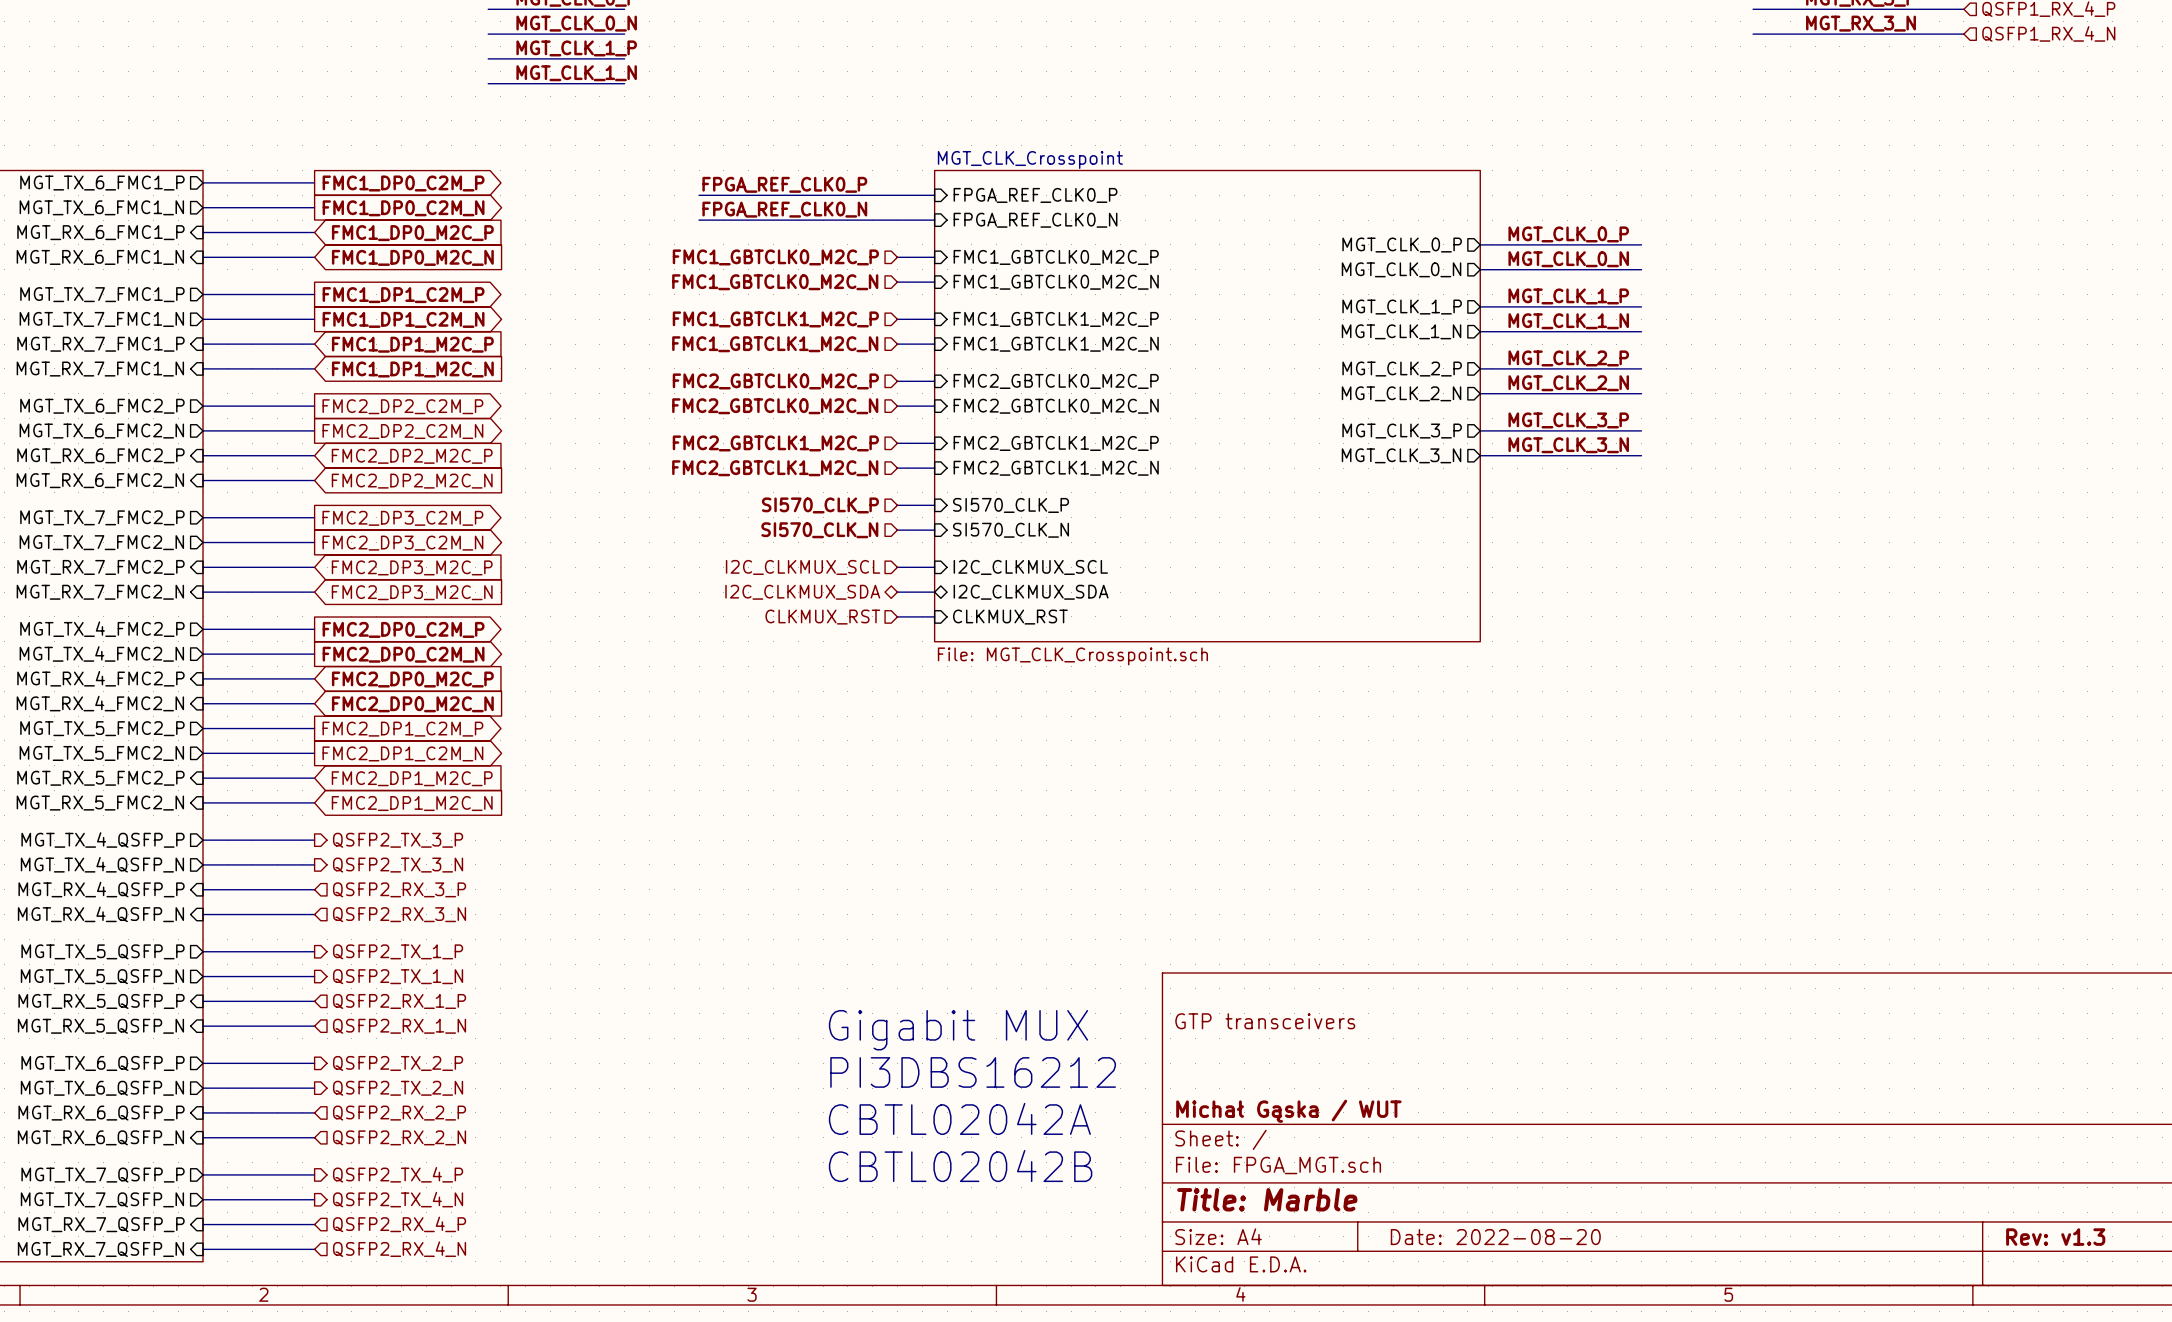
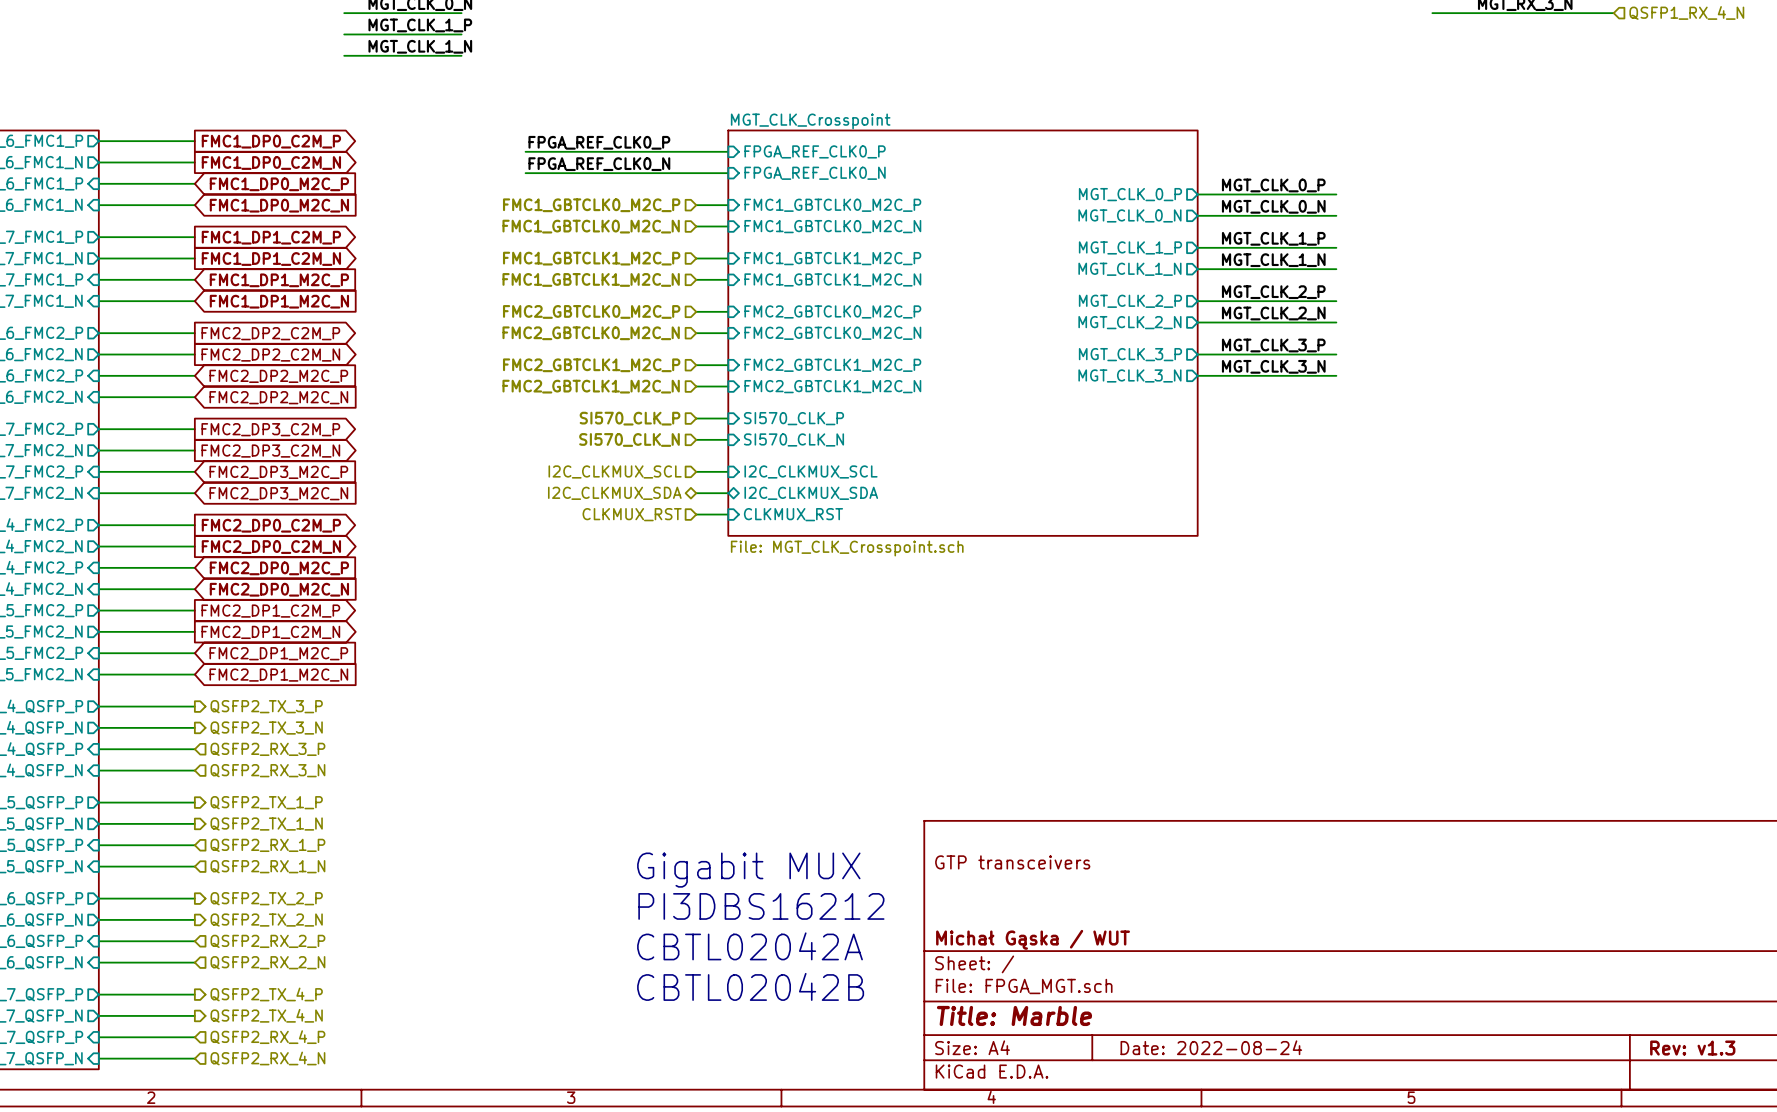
title block: Date: 2022-08-20 (1495, 1237) -> Date: 2022-08-24 (1211, 1047)

